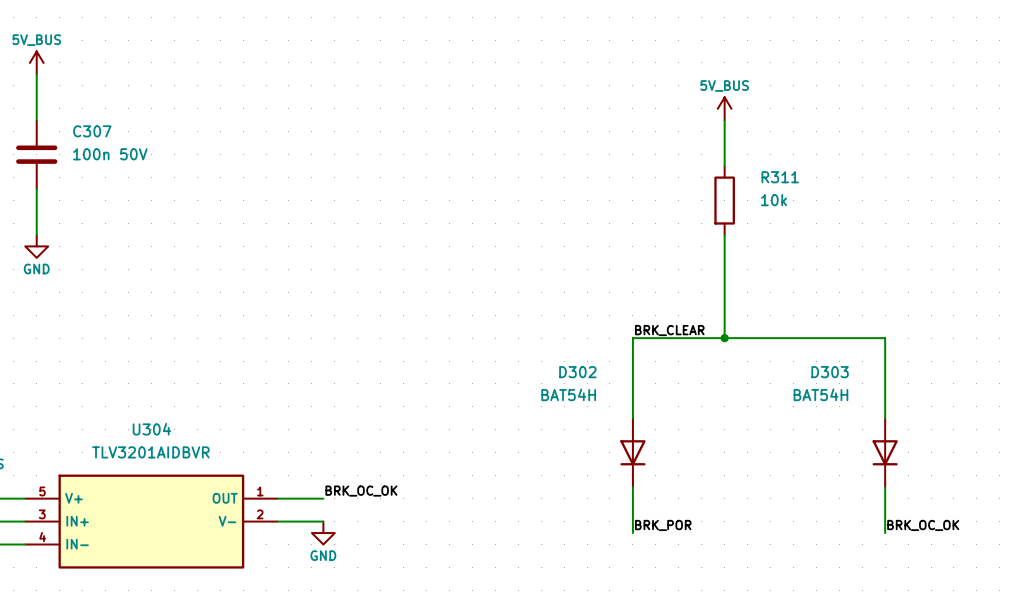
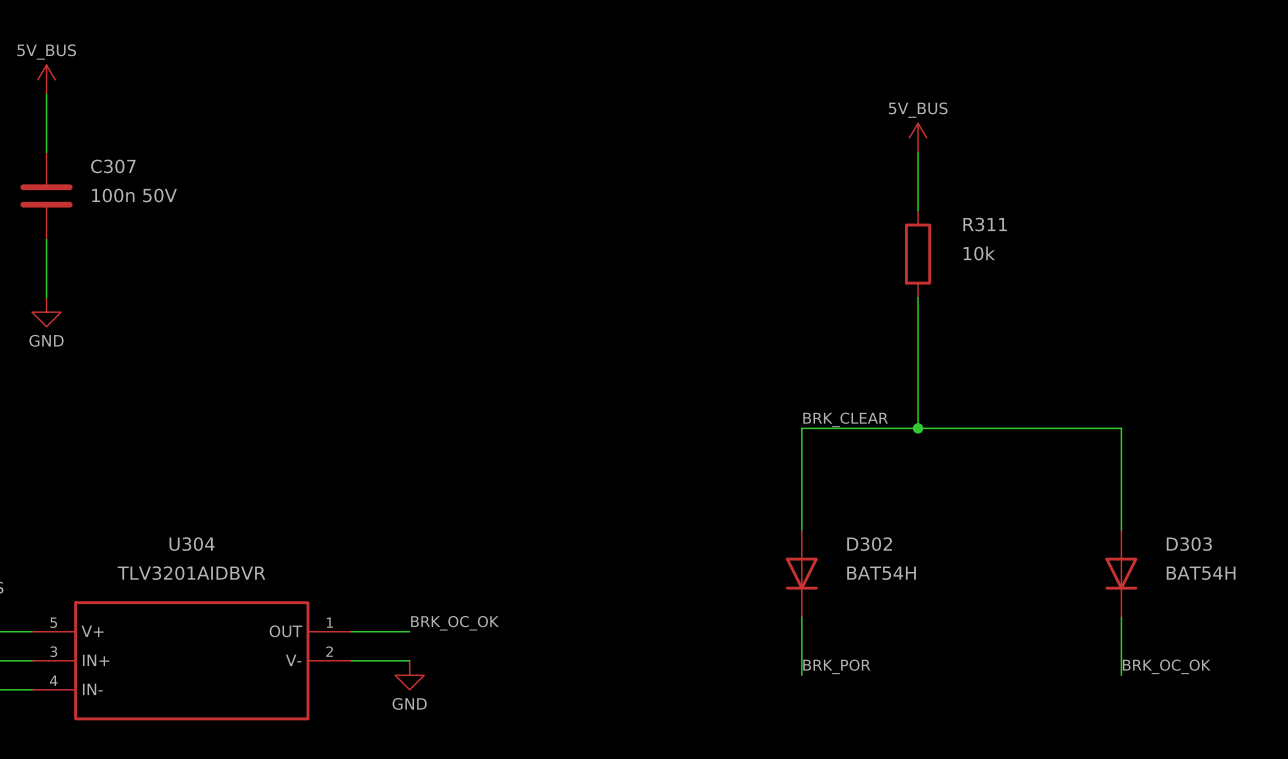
D302 name position: D302 (577, 372) -> D302 (869, 544)
D303 name position: D303 (830, 372) -> D303 (1189, 544)
D302 value position: BAT54H (568, 394) -> BAT54H (881, 573)
D303 value position: BAT54H (820, 394) -> BAT54H (1201, 573)

